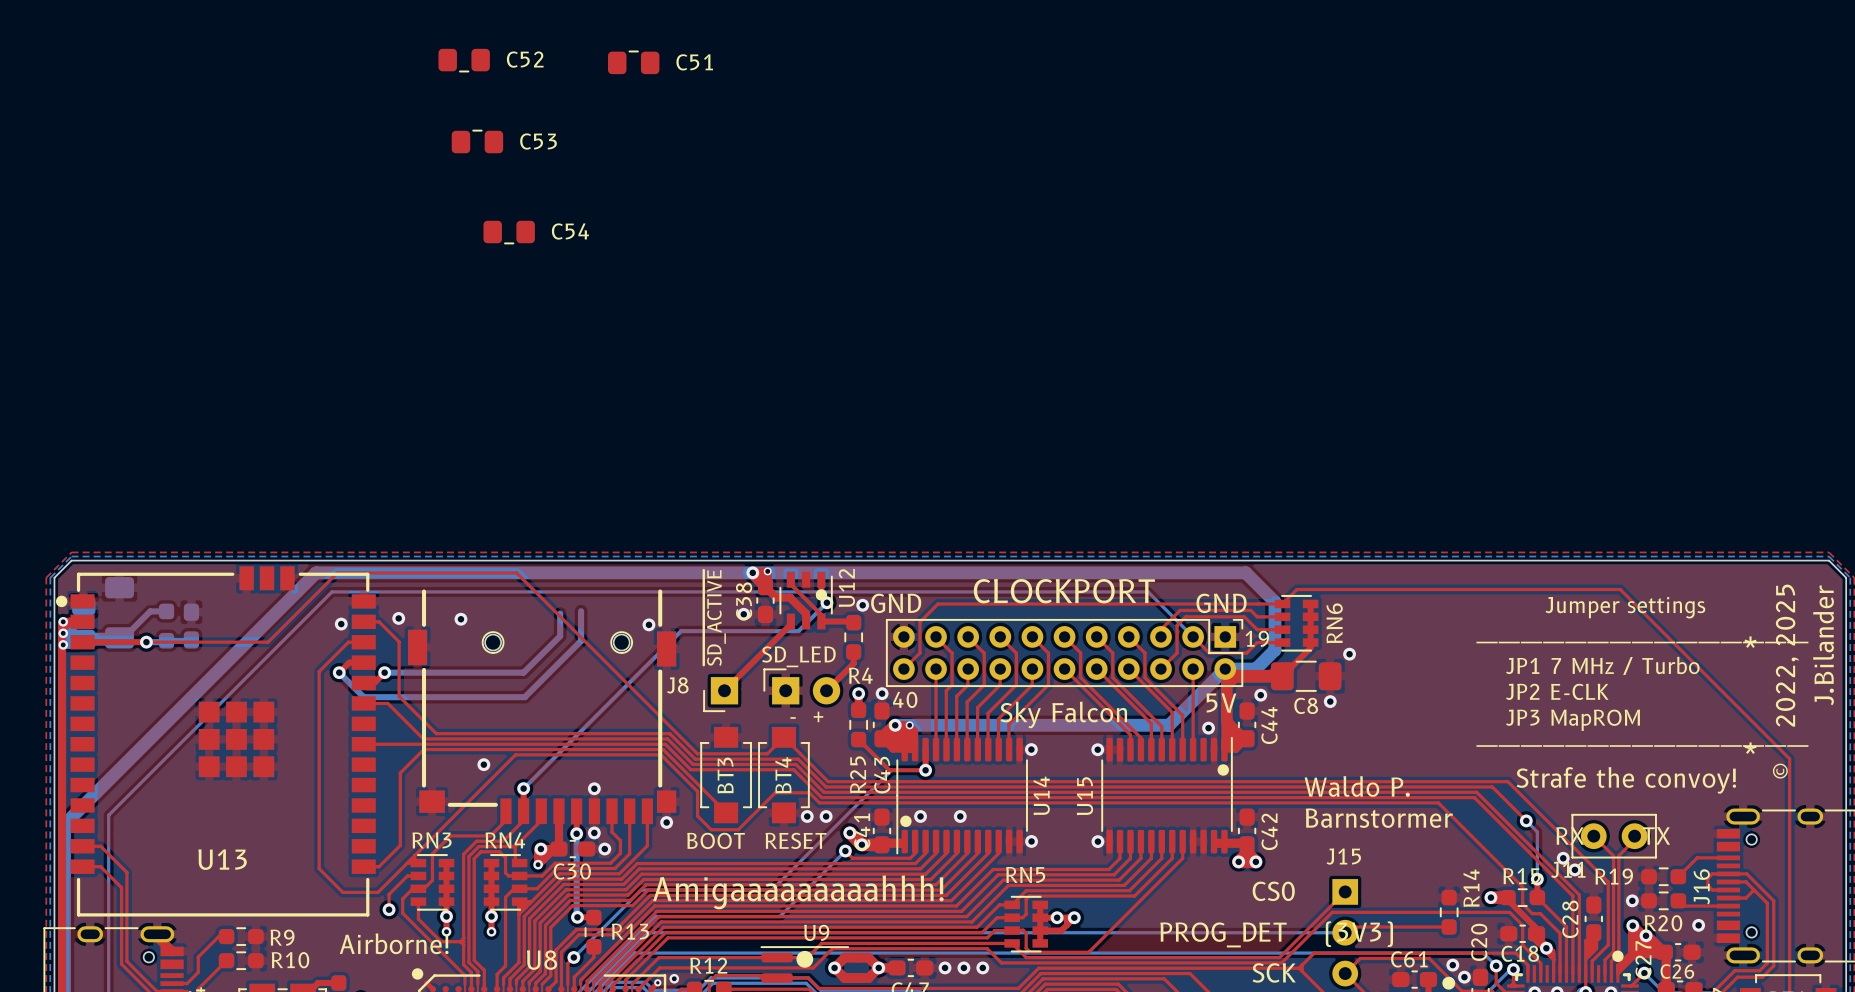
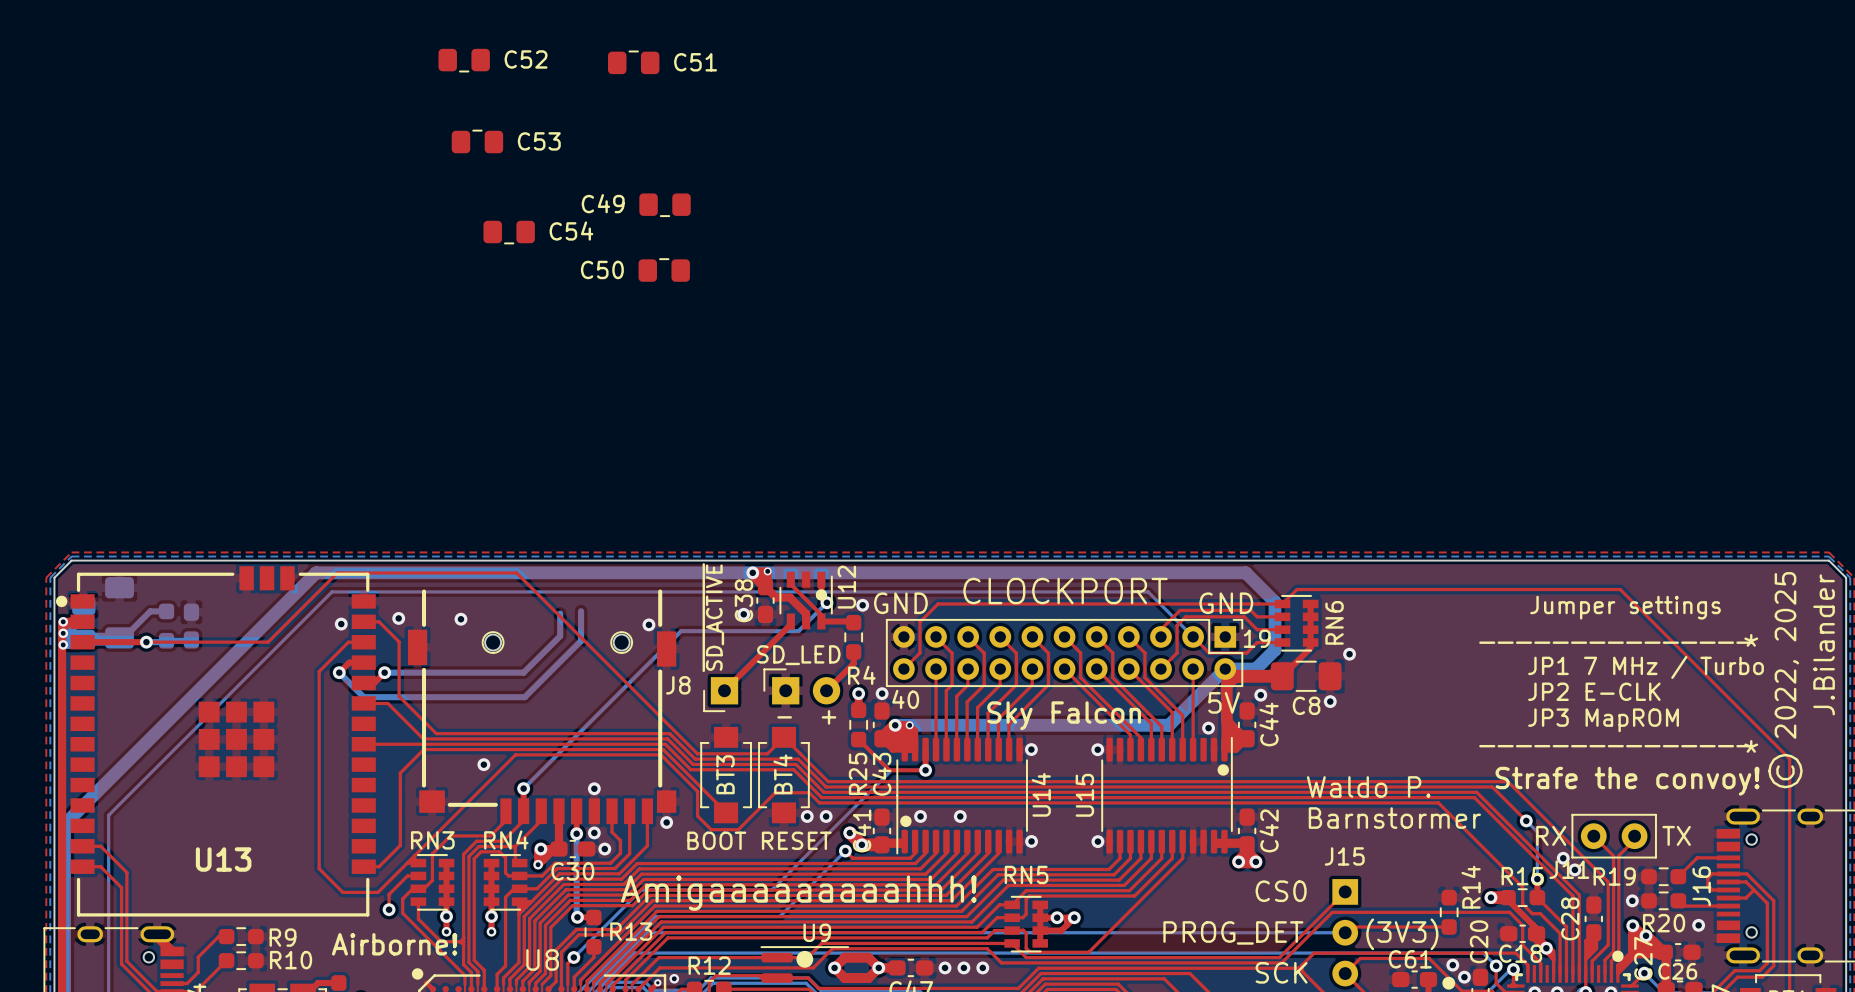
C49: none -> (665, 205)
C50: none -> (664, 270)

